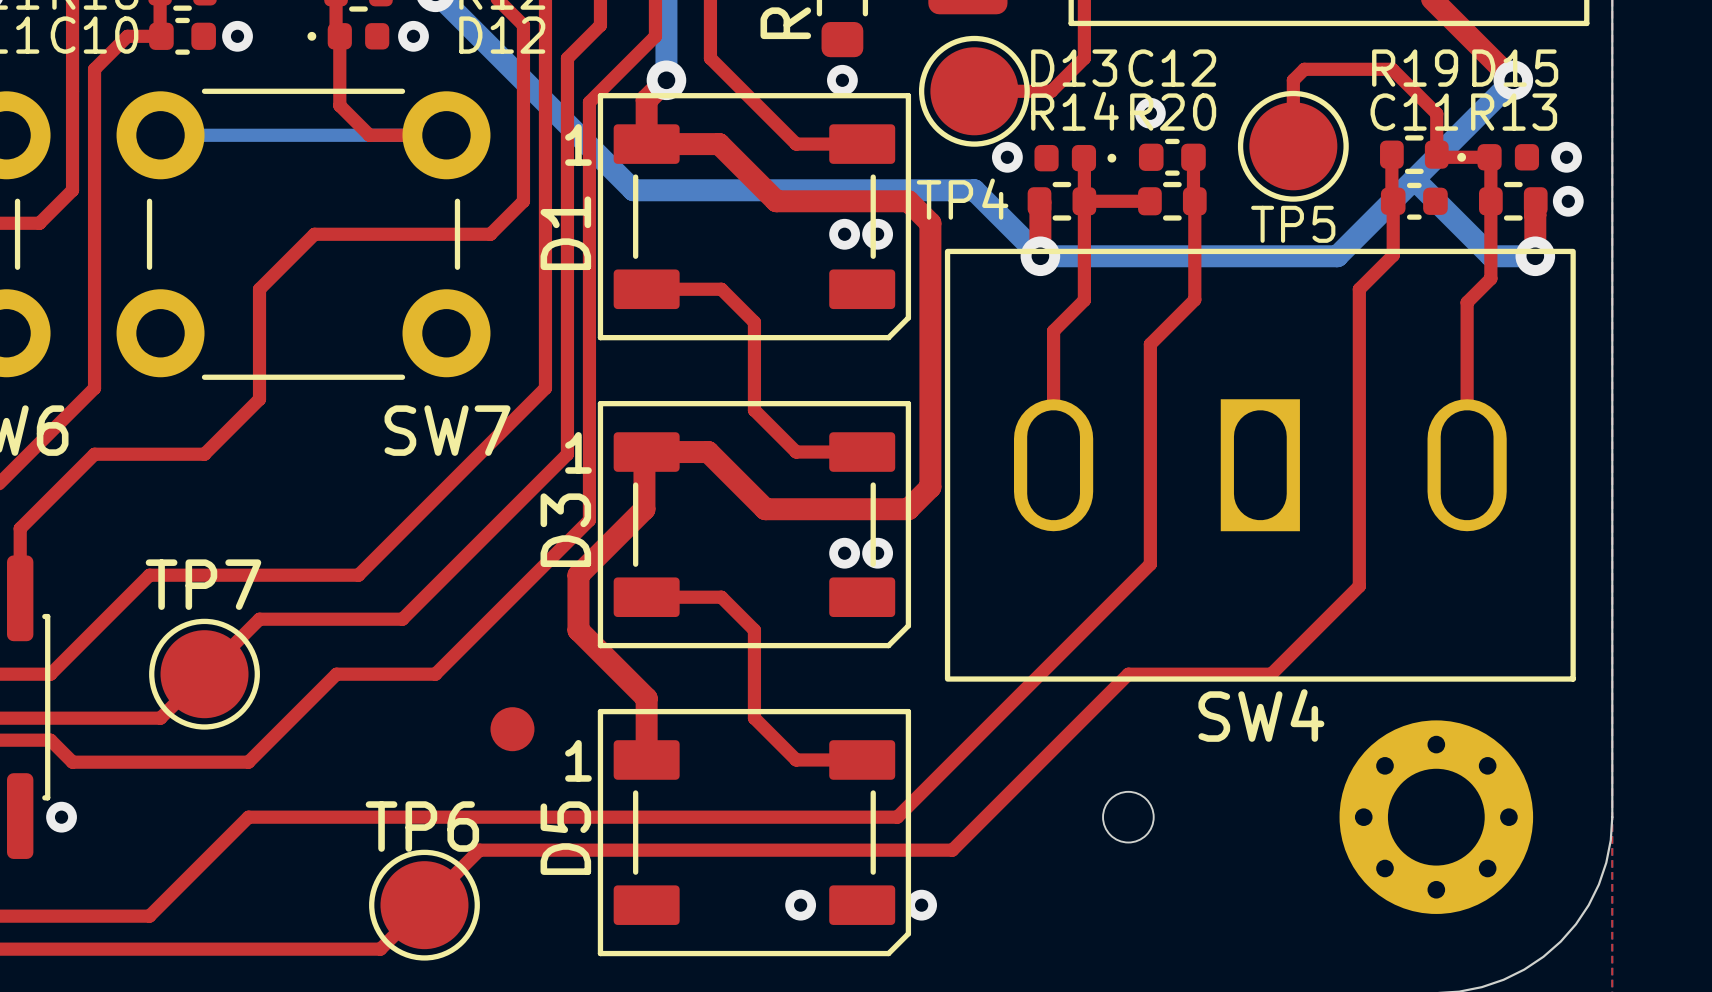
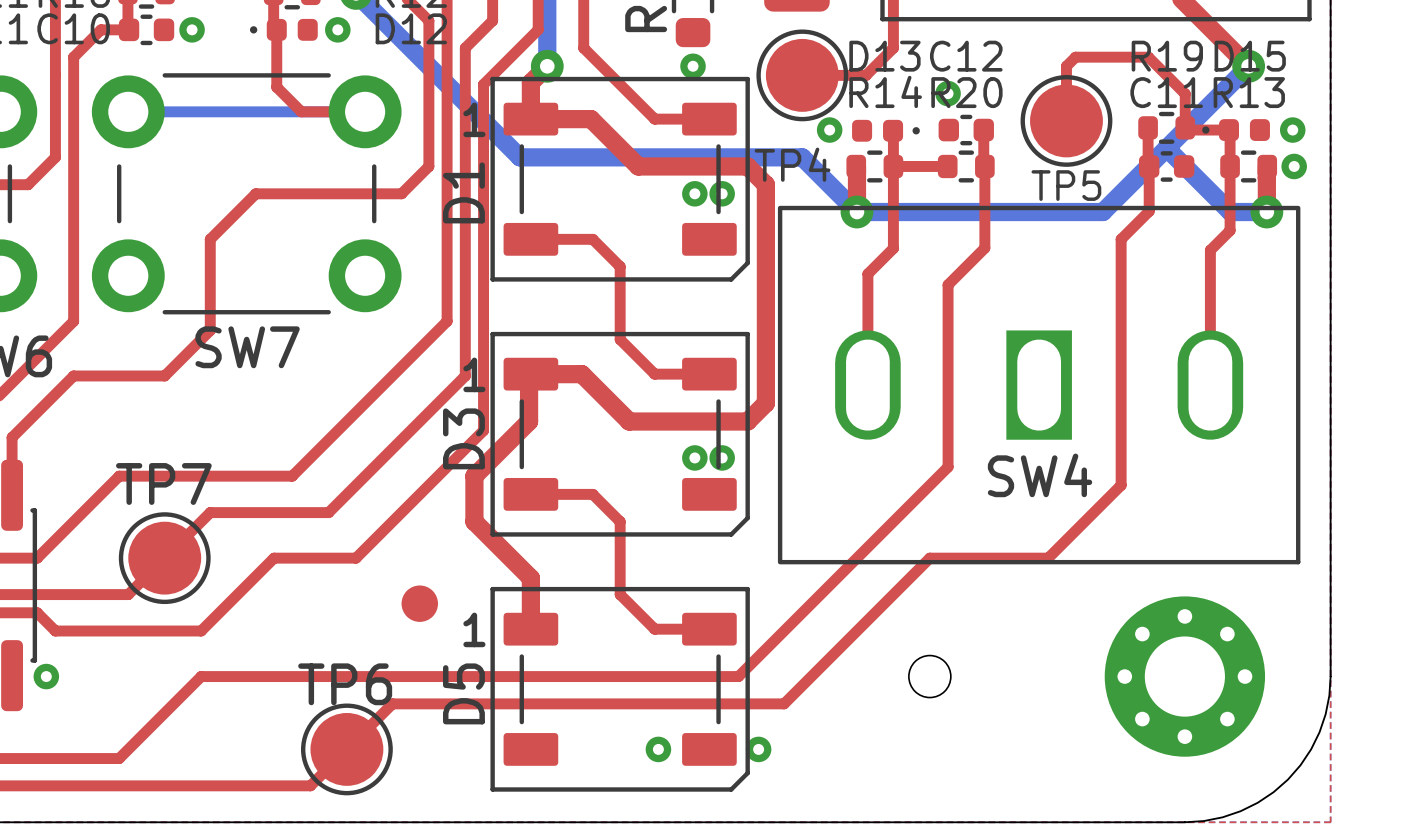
SW7 name position: SW7 (447, 430) -> SW7 (247, 347)
SW4 name position: SW4 (1261, 715) -> SW4 (1040, 475)

